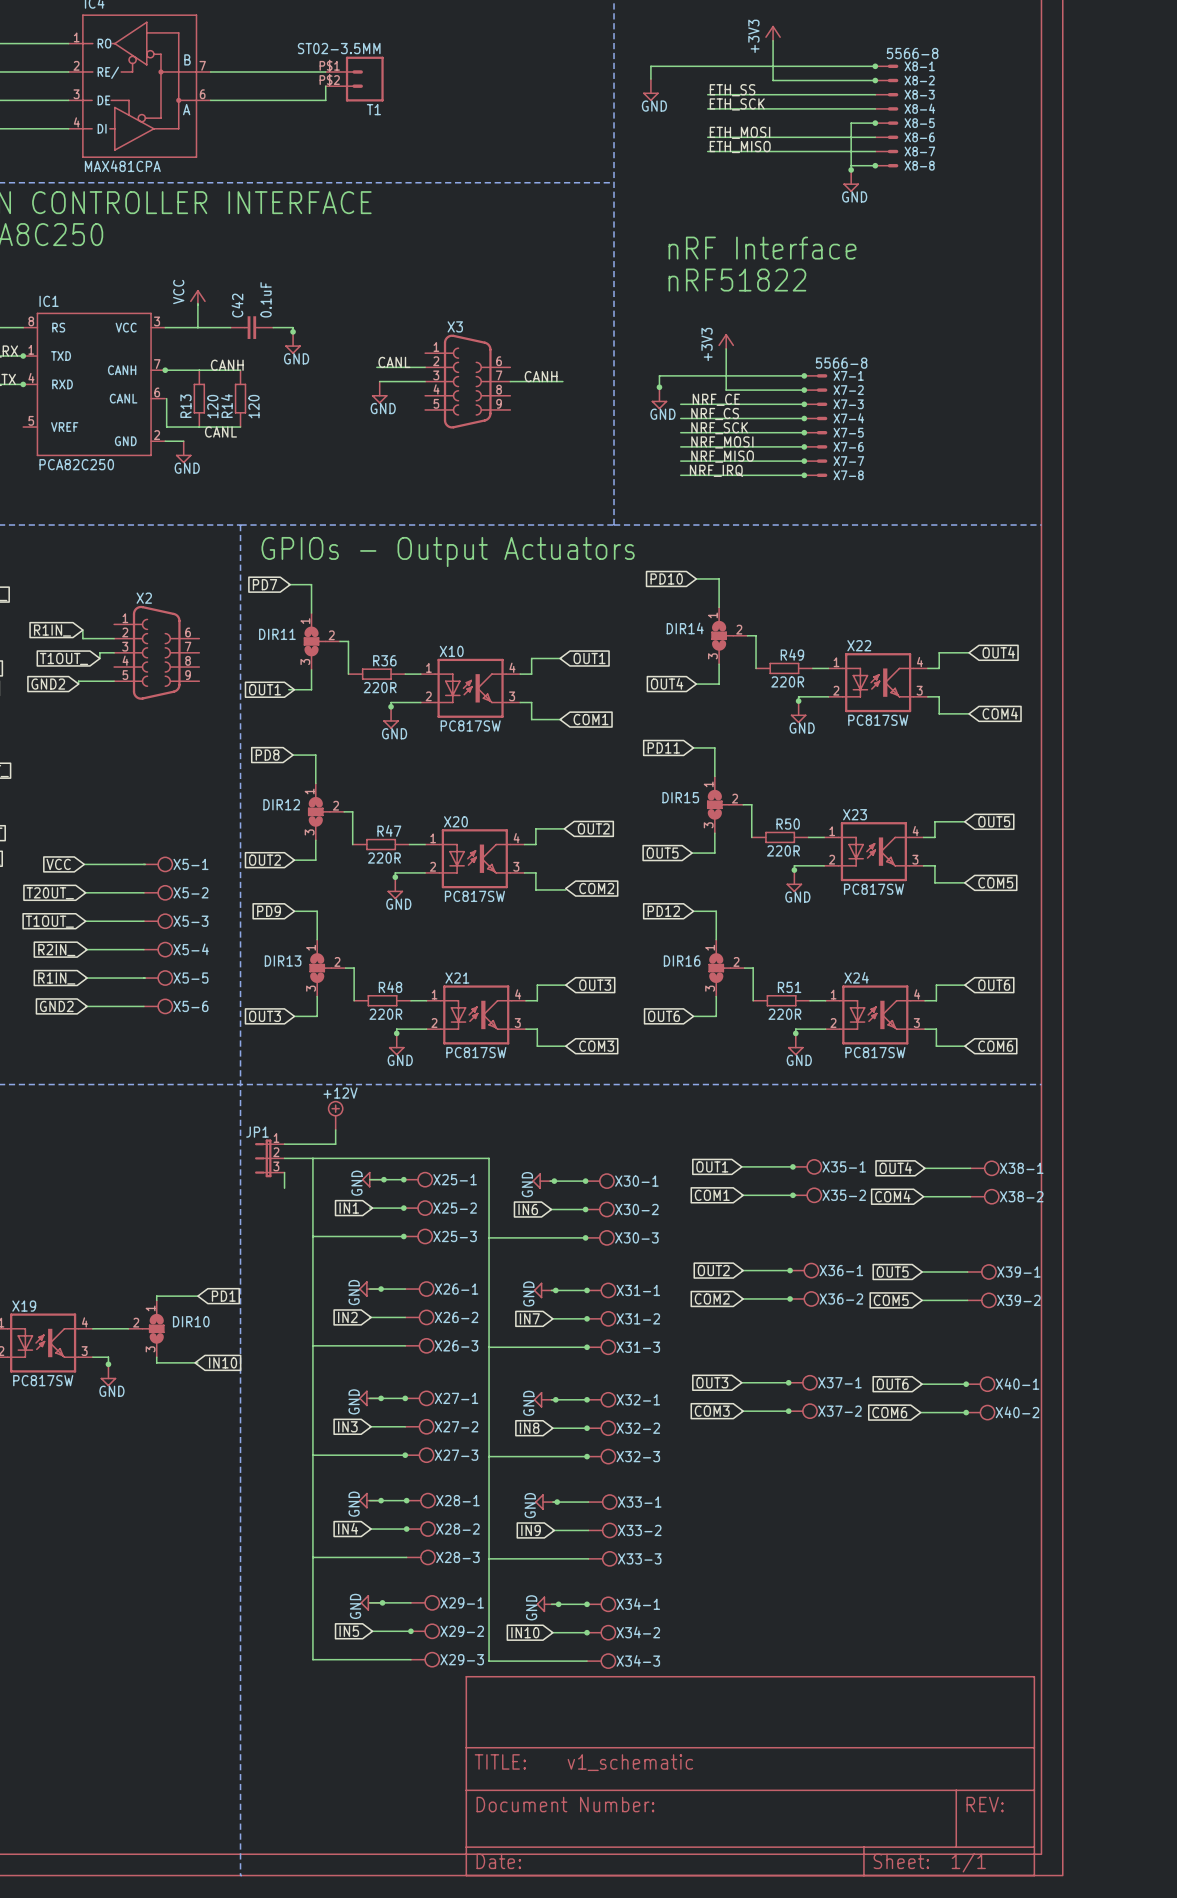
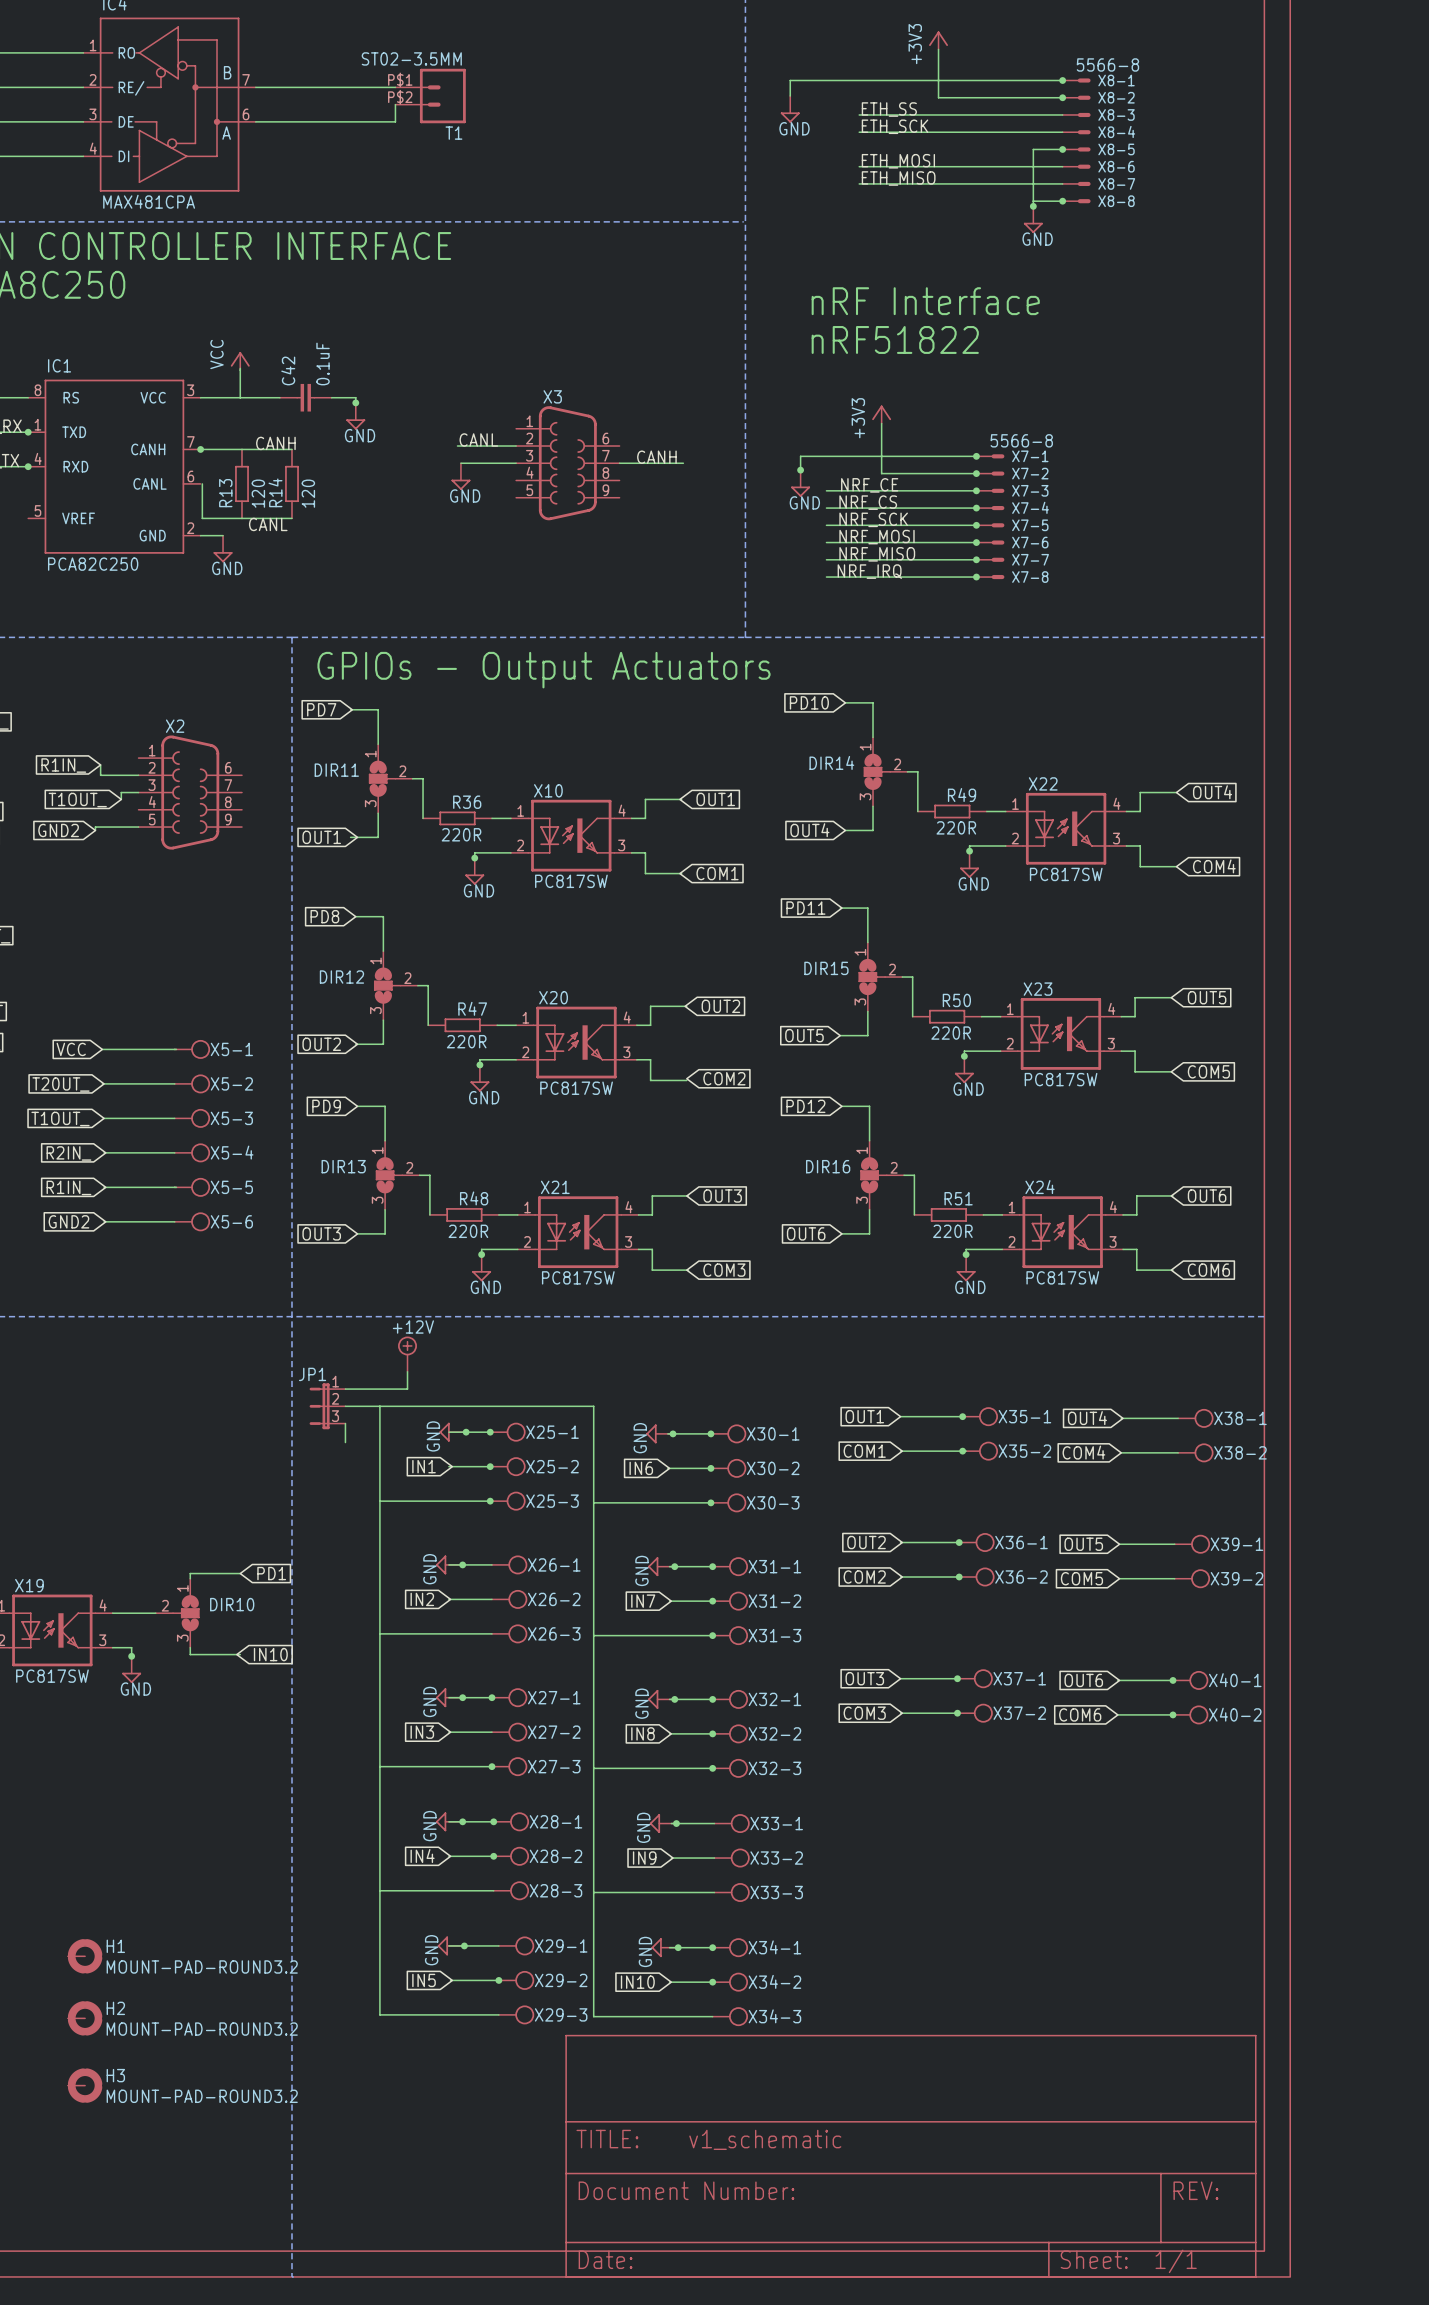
H1: none -> MOUNT-PAD-ROUND3.2 (85, 1956)
H2: none -> MOUNT-PAD-ROUND3.2 (85, 2018)
H3: none -> MOUNT-PAD-ROUND3.2 (85, 2085)

